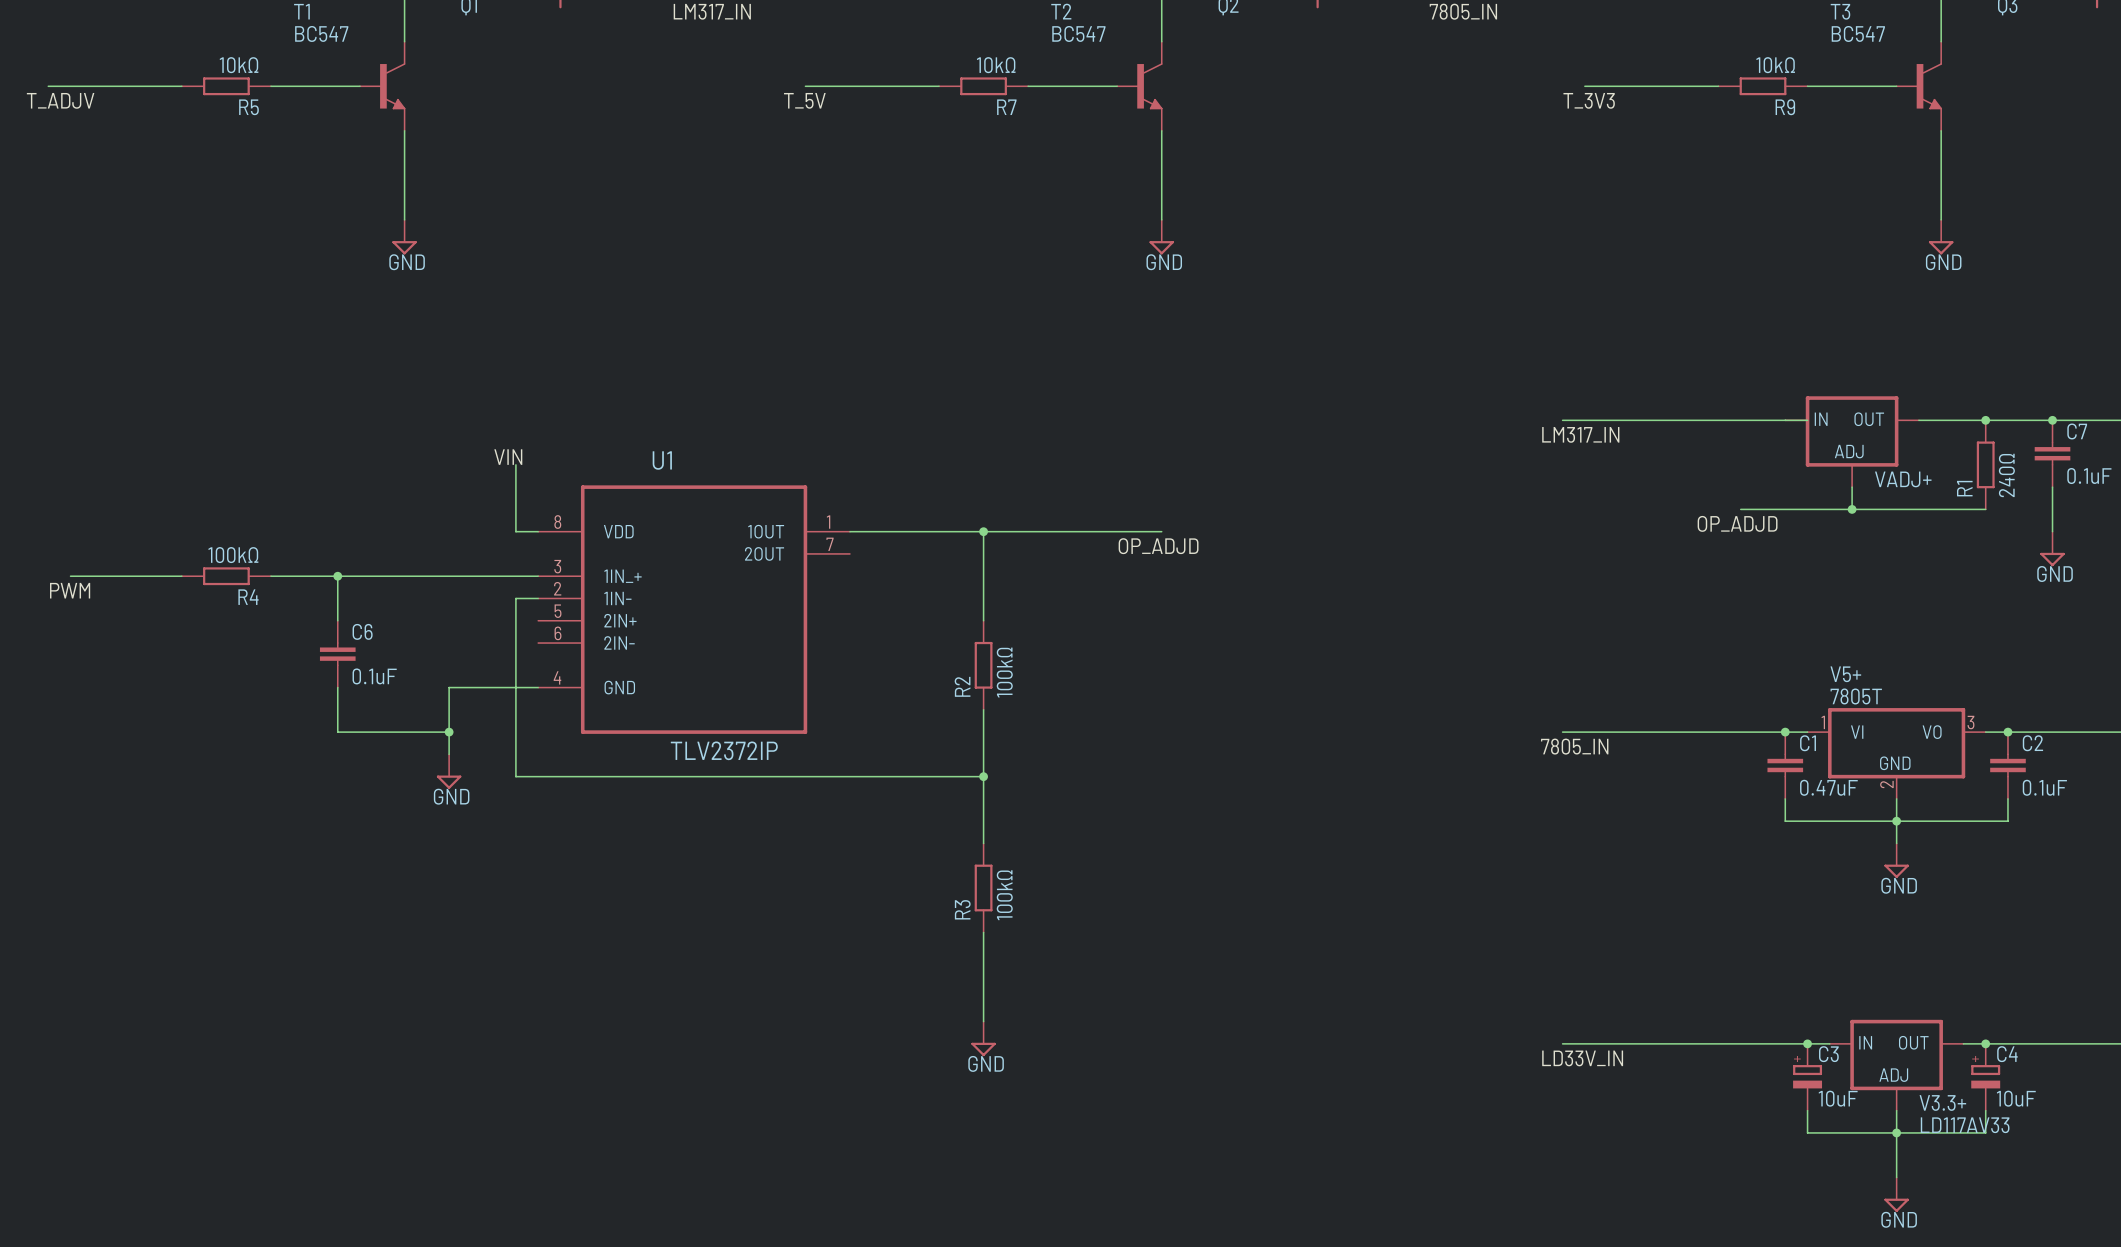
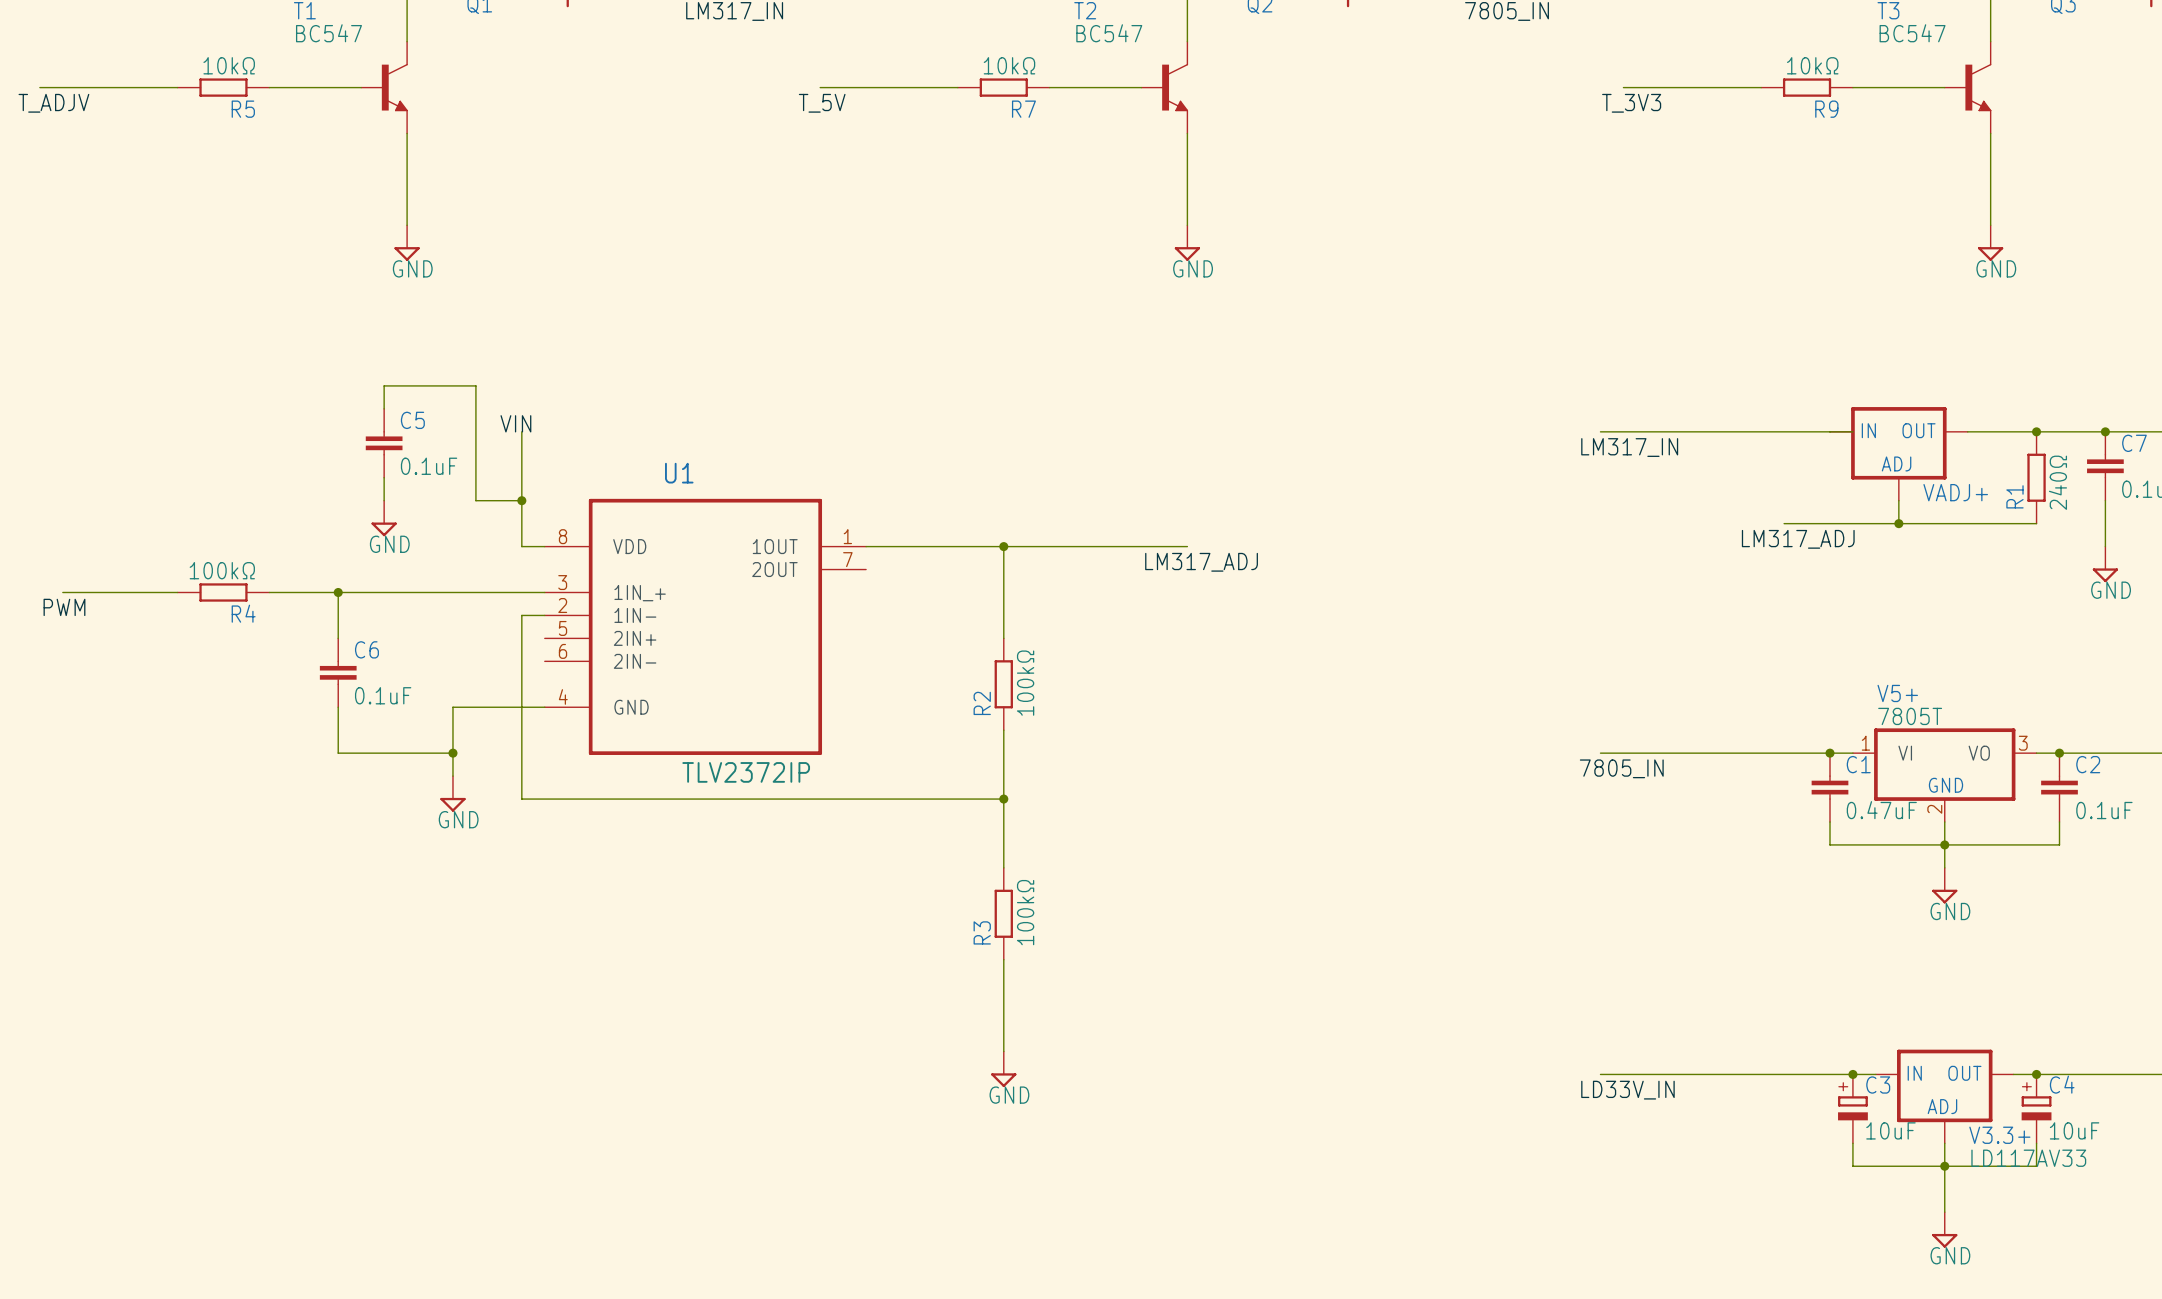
wire: none -> (384, 408) (384, 385) (475, 385) (475, 500) (521, 500)
wire: none -> (521, 431) (521, 477)
C5: none -> 0.1uF (384, 443)
label position: VIN (508, 457) -> VIN (515, 423)
wire: none -> (384, 477) (384, 500)
junction: none -> (521, 500)
power symbol: none -> GND (384, 518)
label: OP_ADJD (1737, 523) -> LM317_ADJ (1798, 539)
label: OP_ADJD (1158, 546) -> LM317_ADJ (1201, 562)

